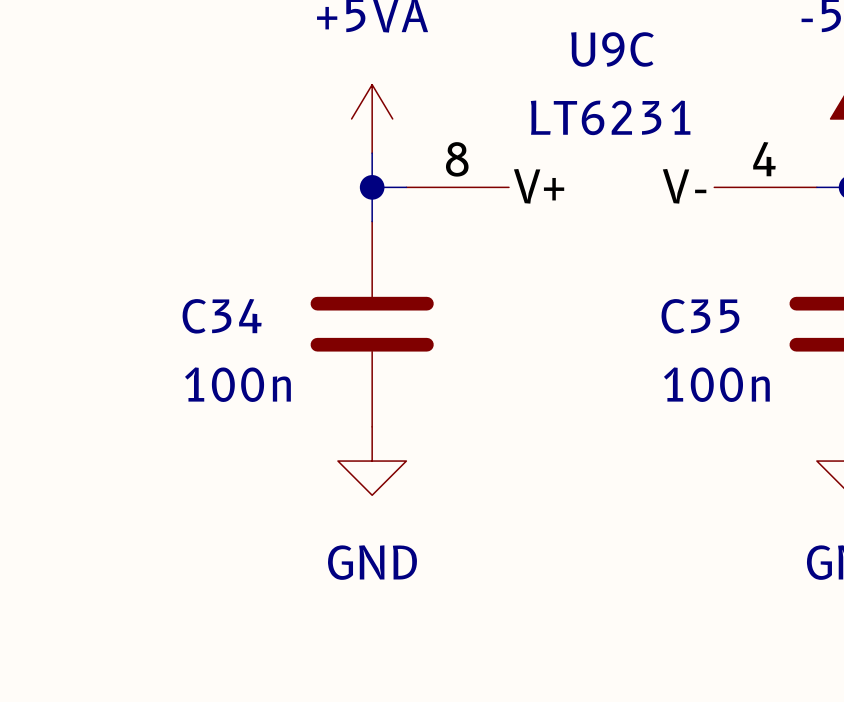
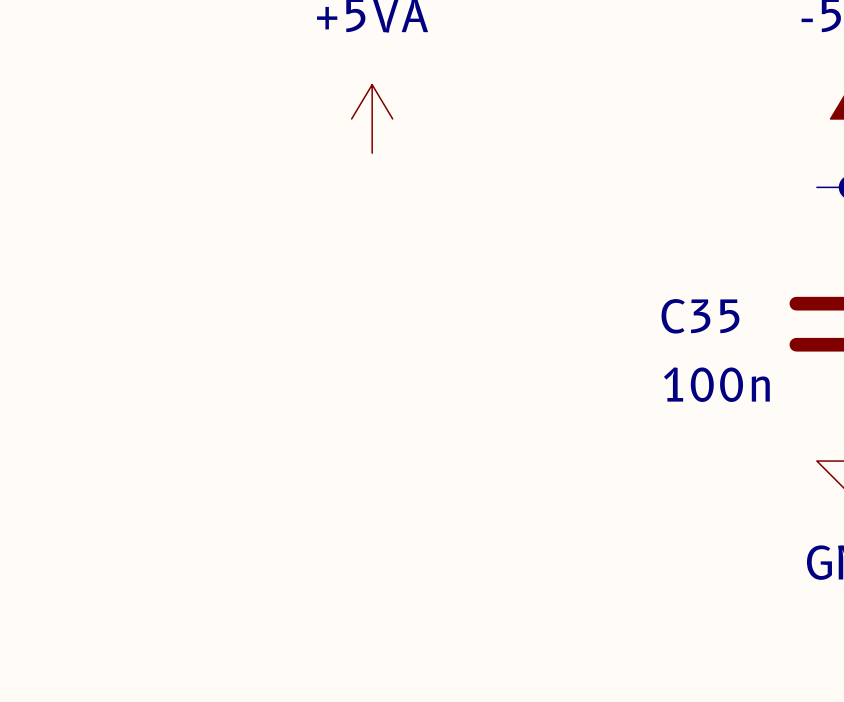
wire: (372, 153) (372, 221) -> none
wire: (372, 187) (406, 187) -> none
junction: (372, 187) -> none
U9C: LT6231 (611, 187) -> none
C34: 100n (372, 324) -> none
power symbol: GND (372, 461) -> none

